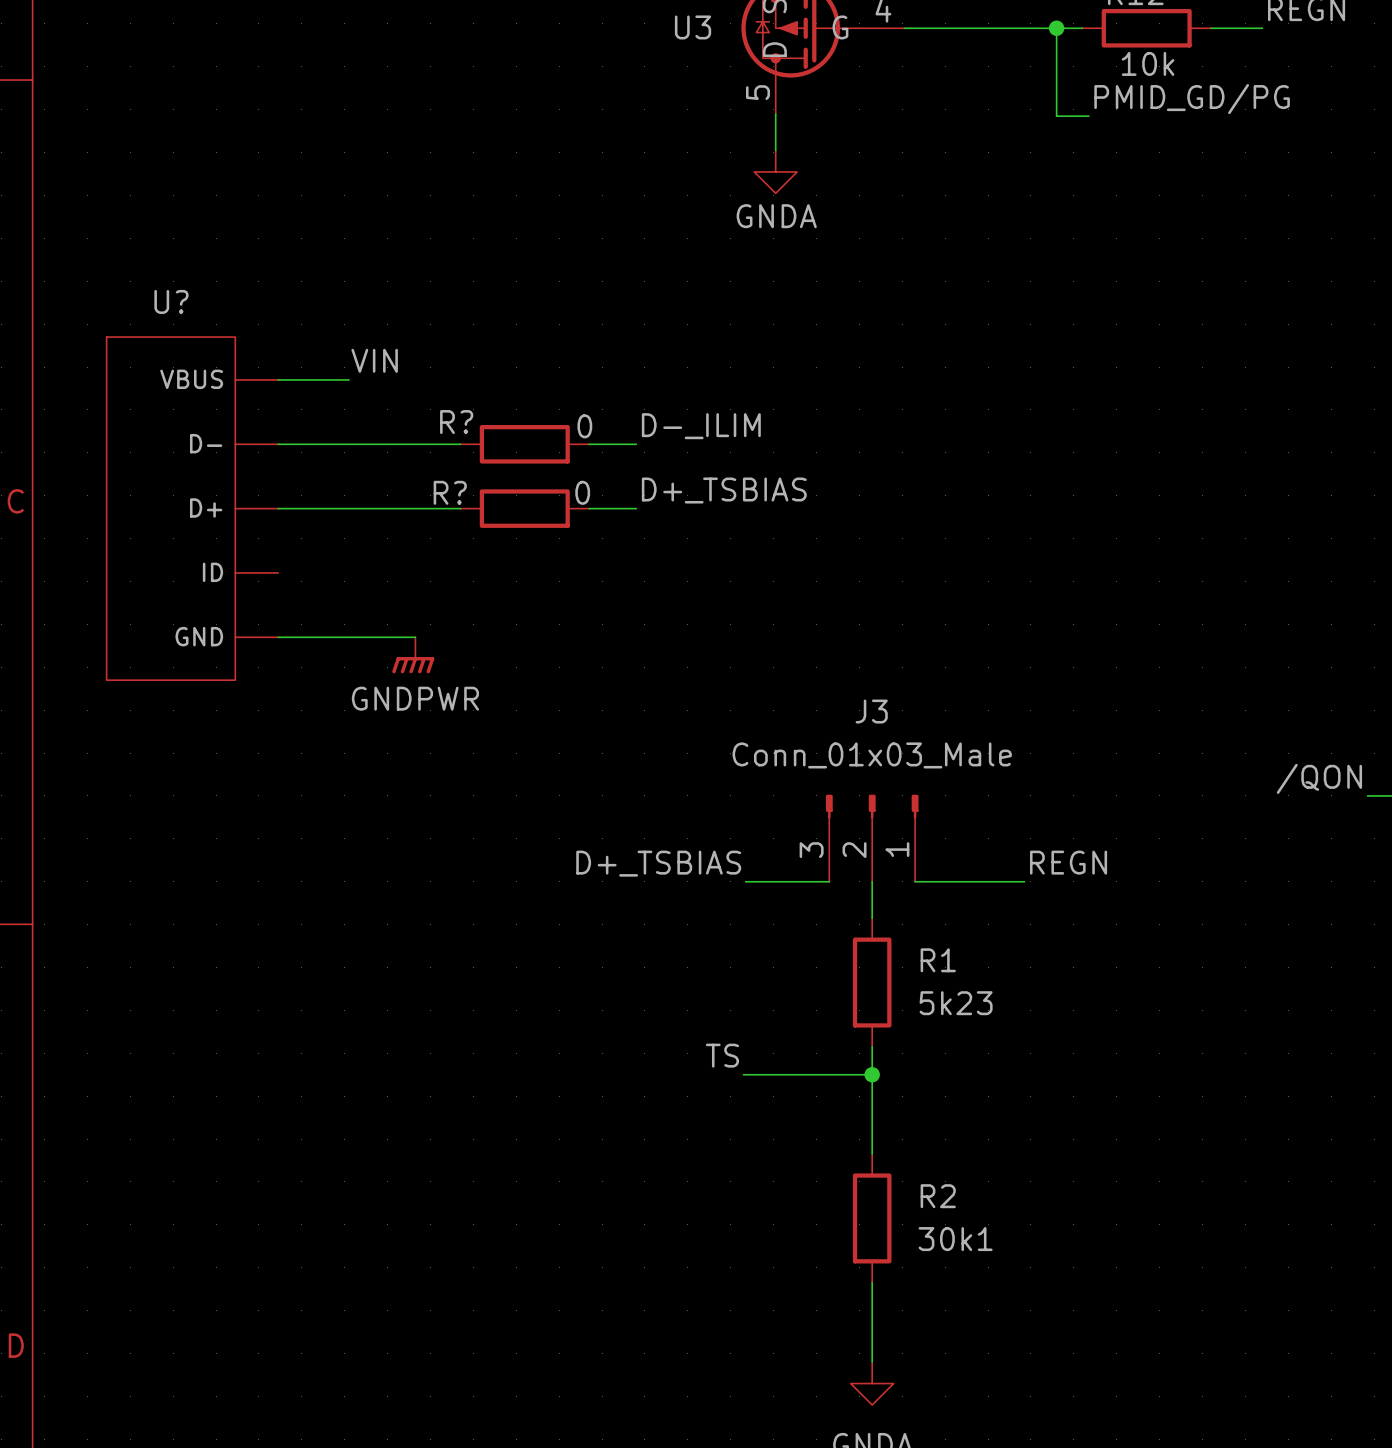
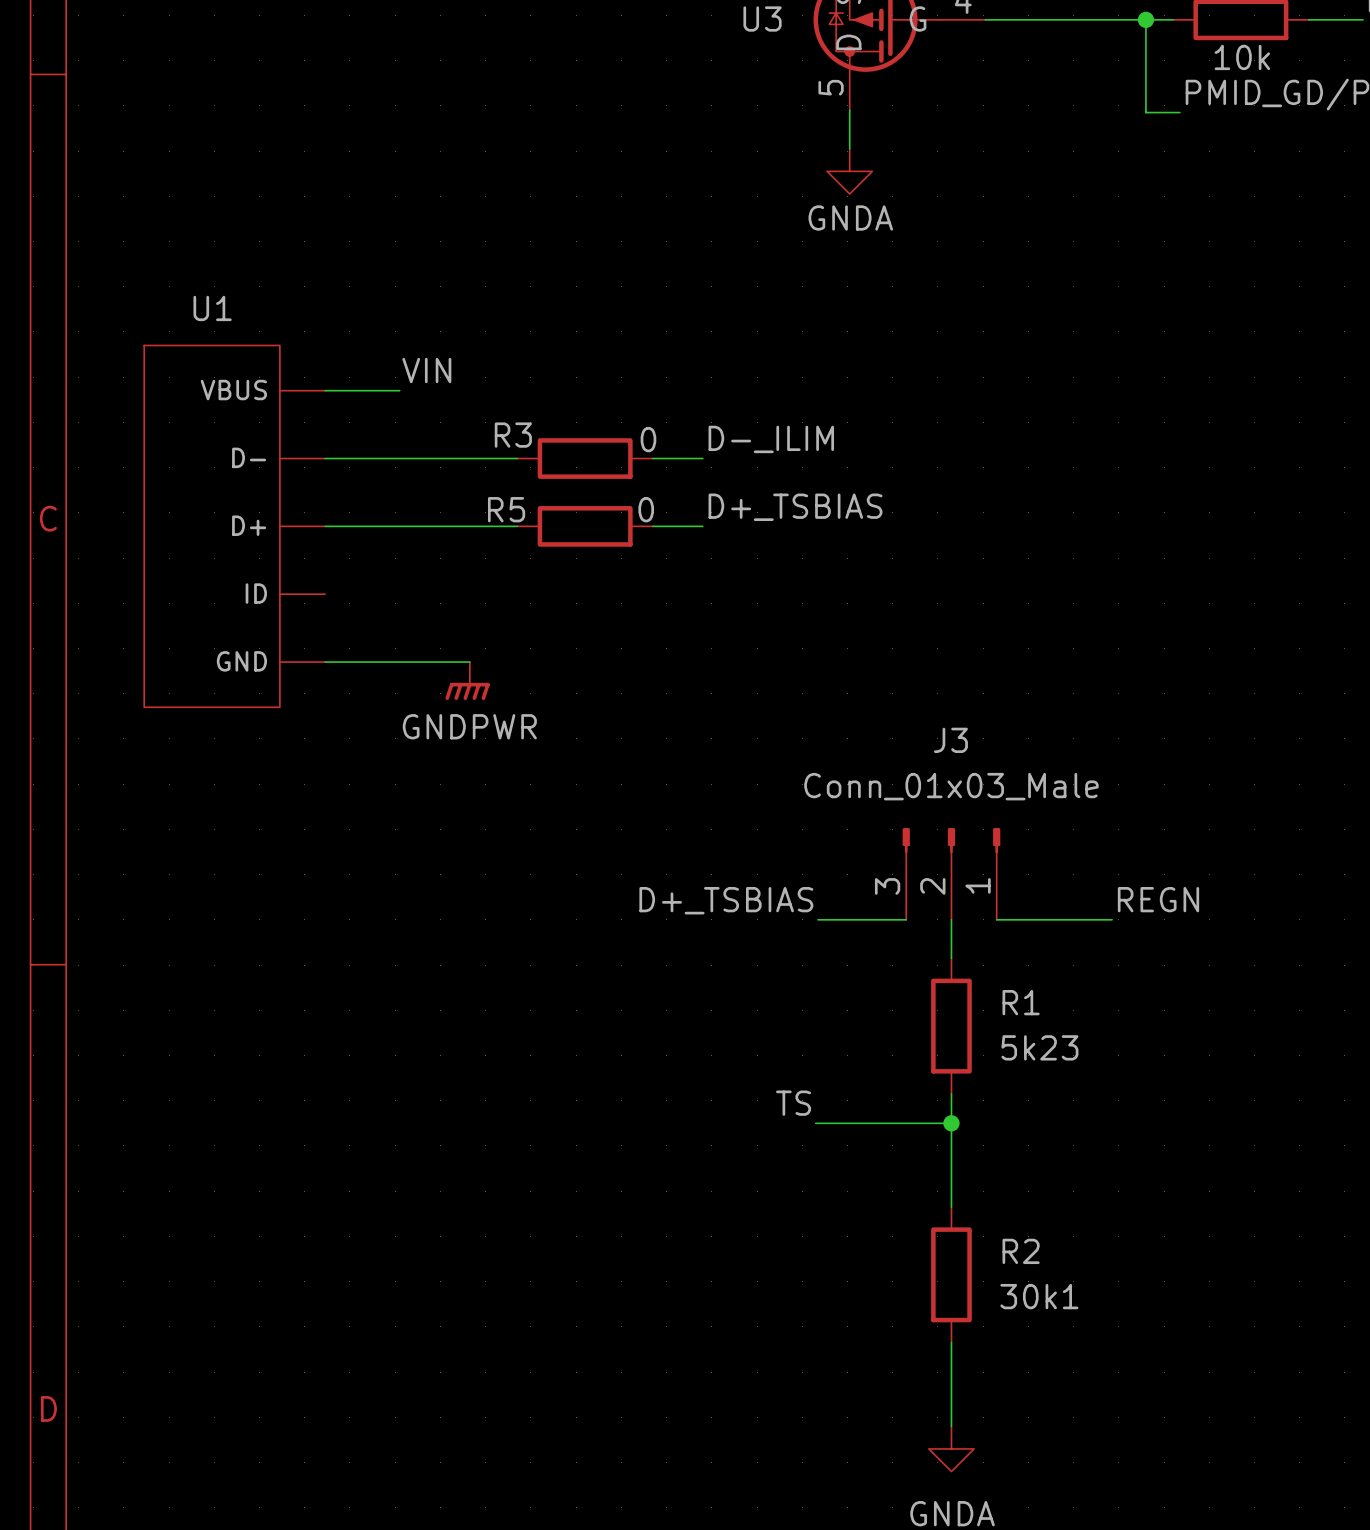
U? name: U? (171, 301) -> U1 (212, 308)
R? name: R? (456, 422) -> R3 (513, 435)
R? name: R? (450, 492) -> R5 (506, 509)

